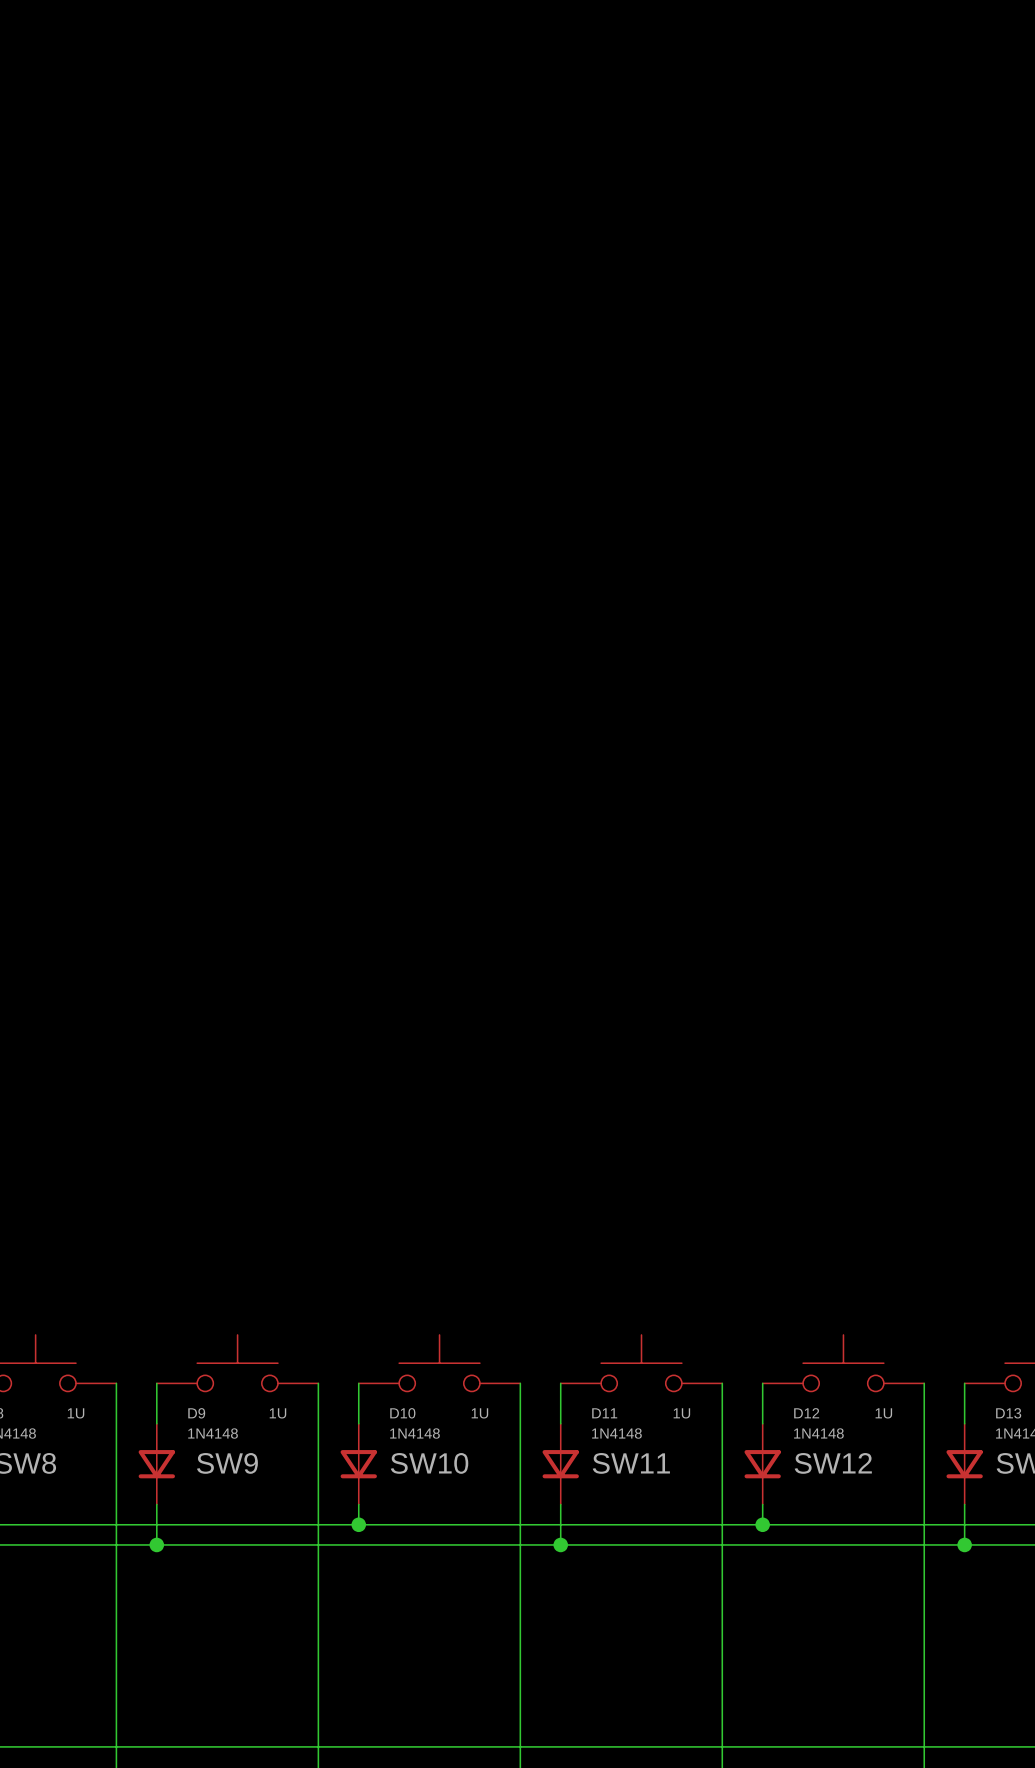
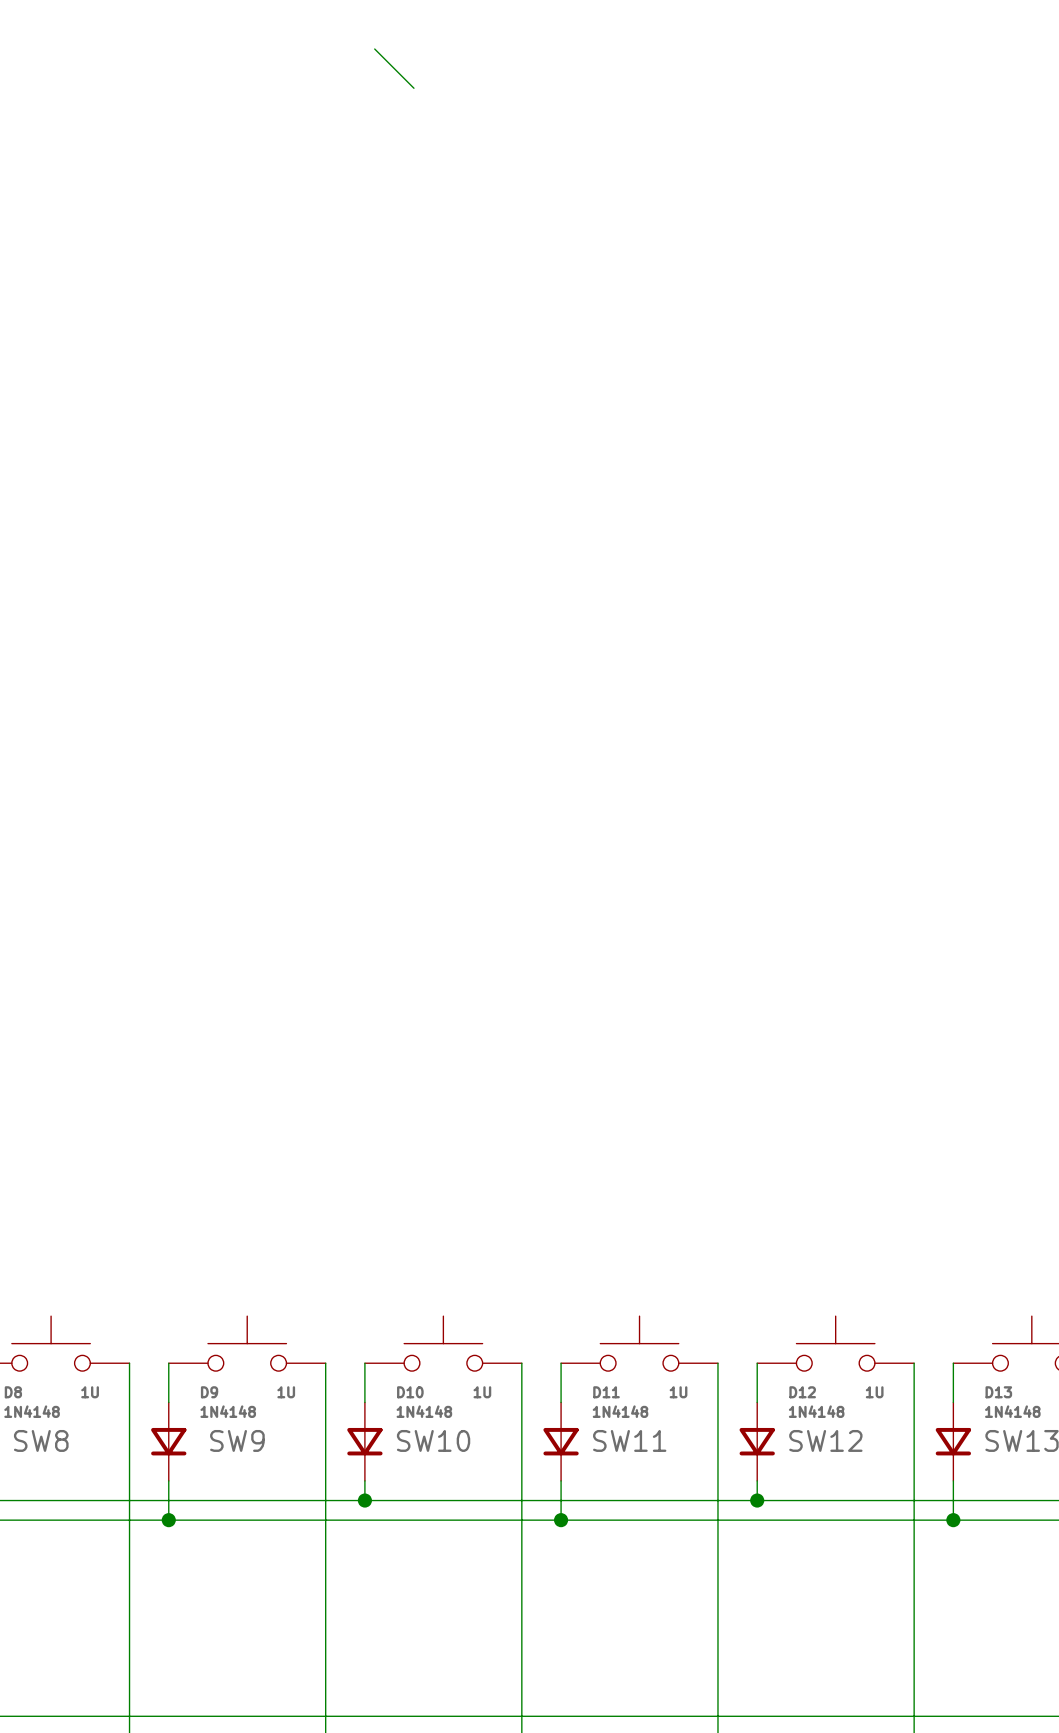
wire: none -> (374, 49) (413, 88)

